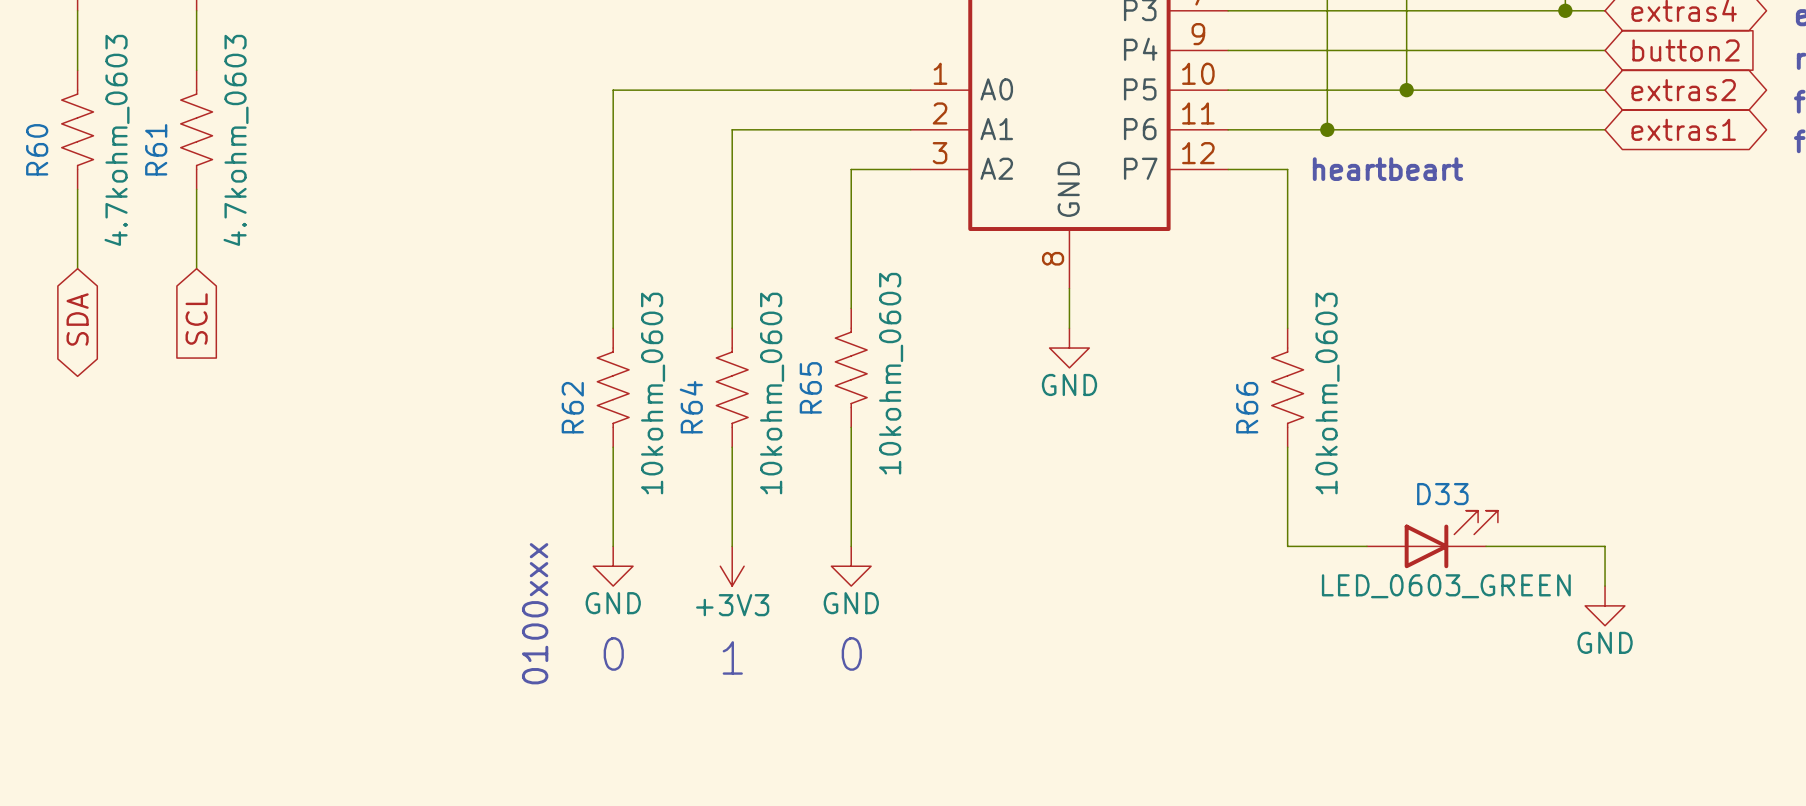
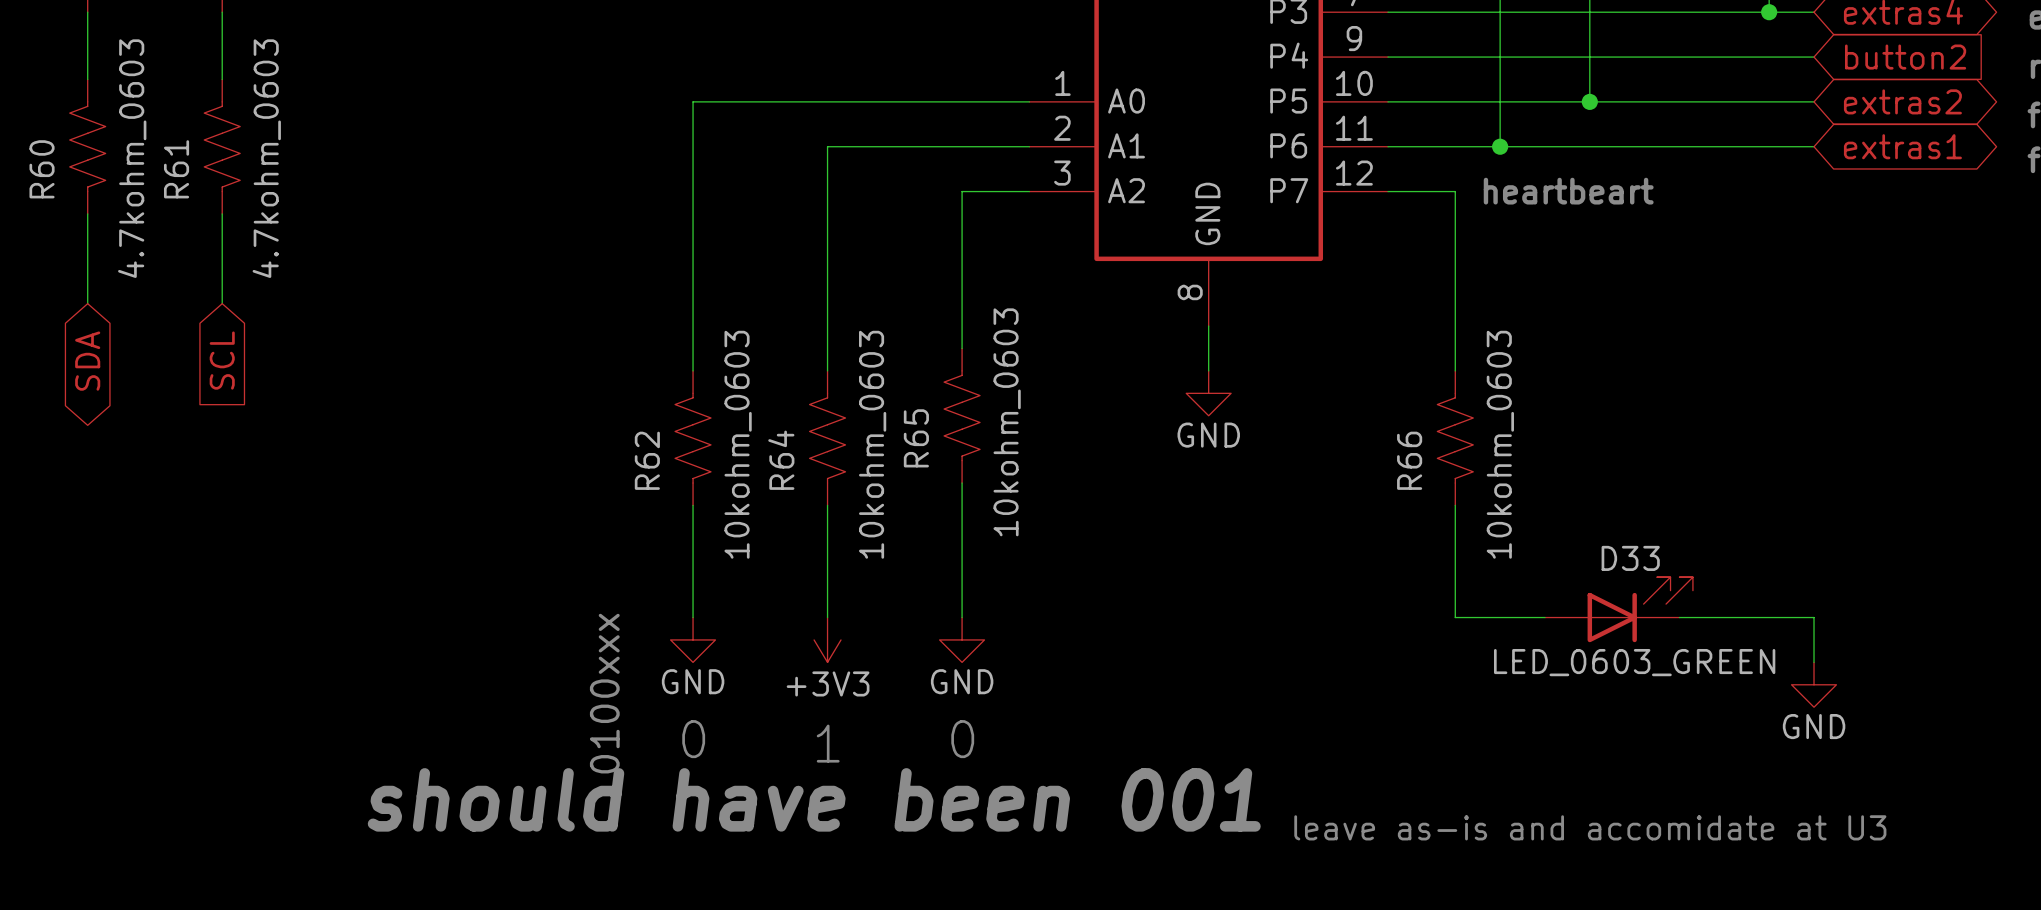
text: none -> should have been 001 (814, 799)
text: none -> leave as-is and accomidate at U3 (1590, 827)

